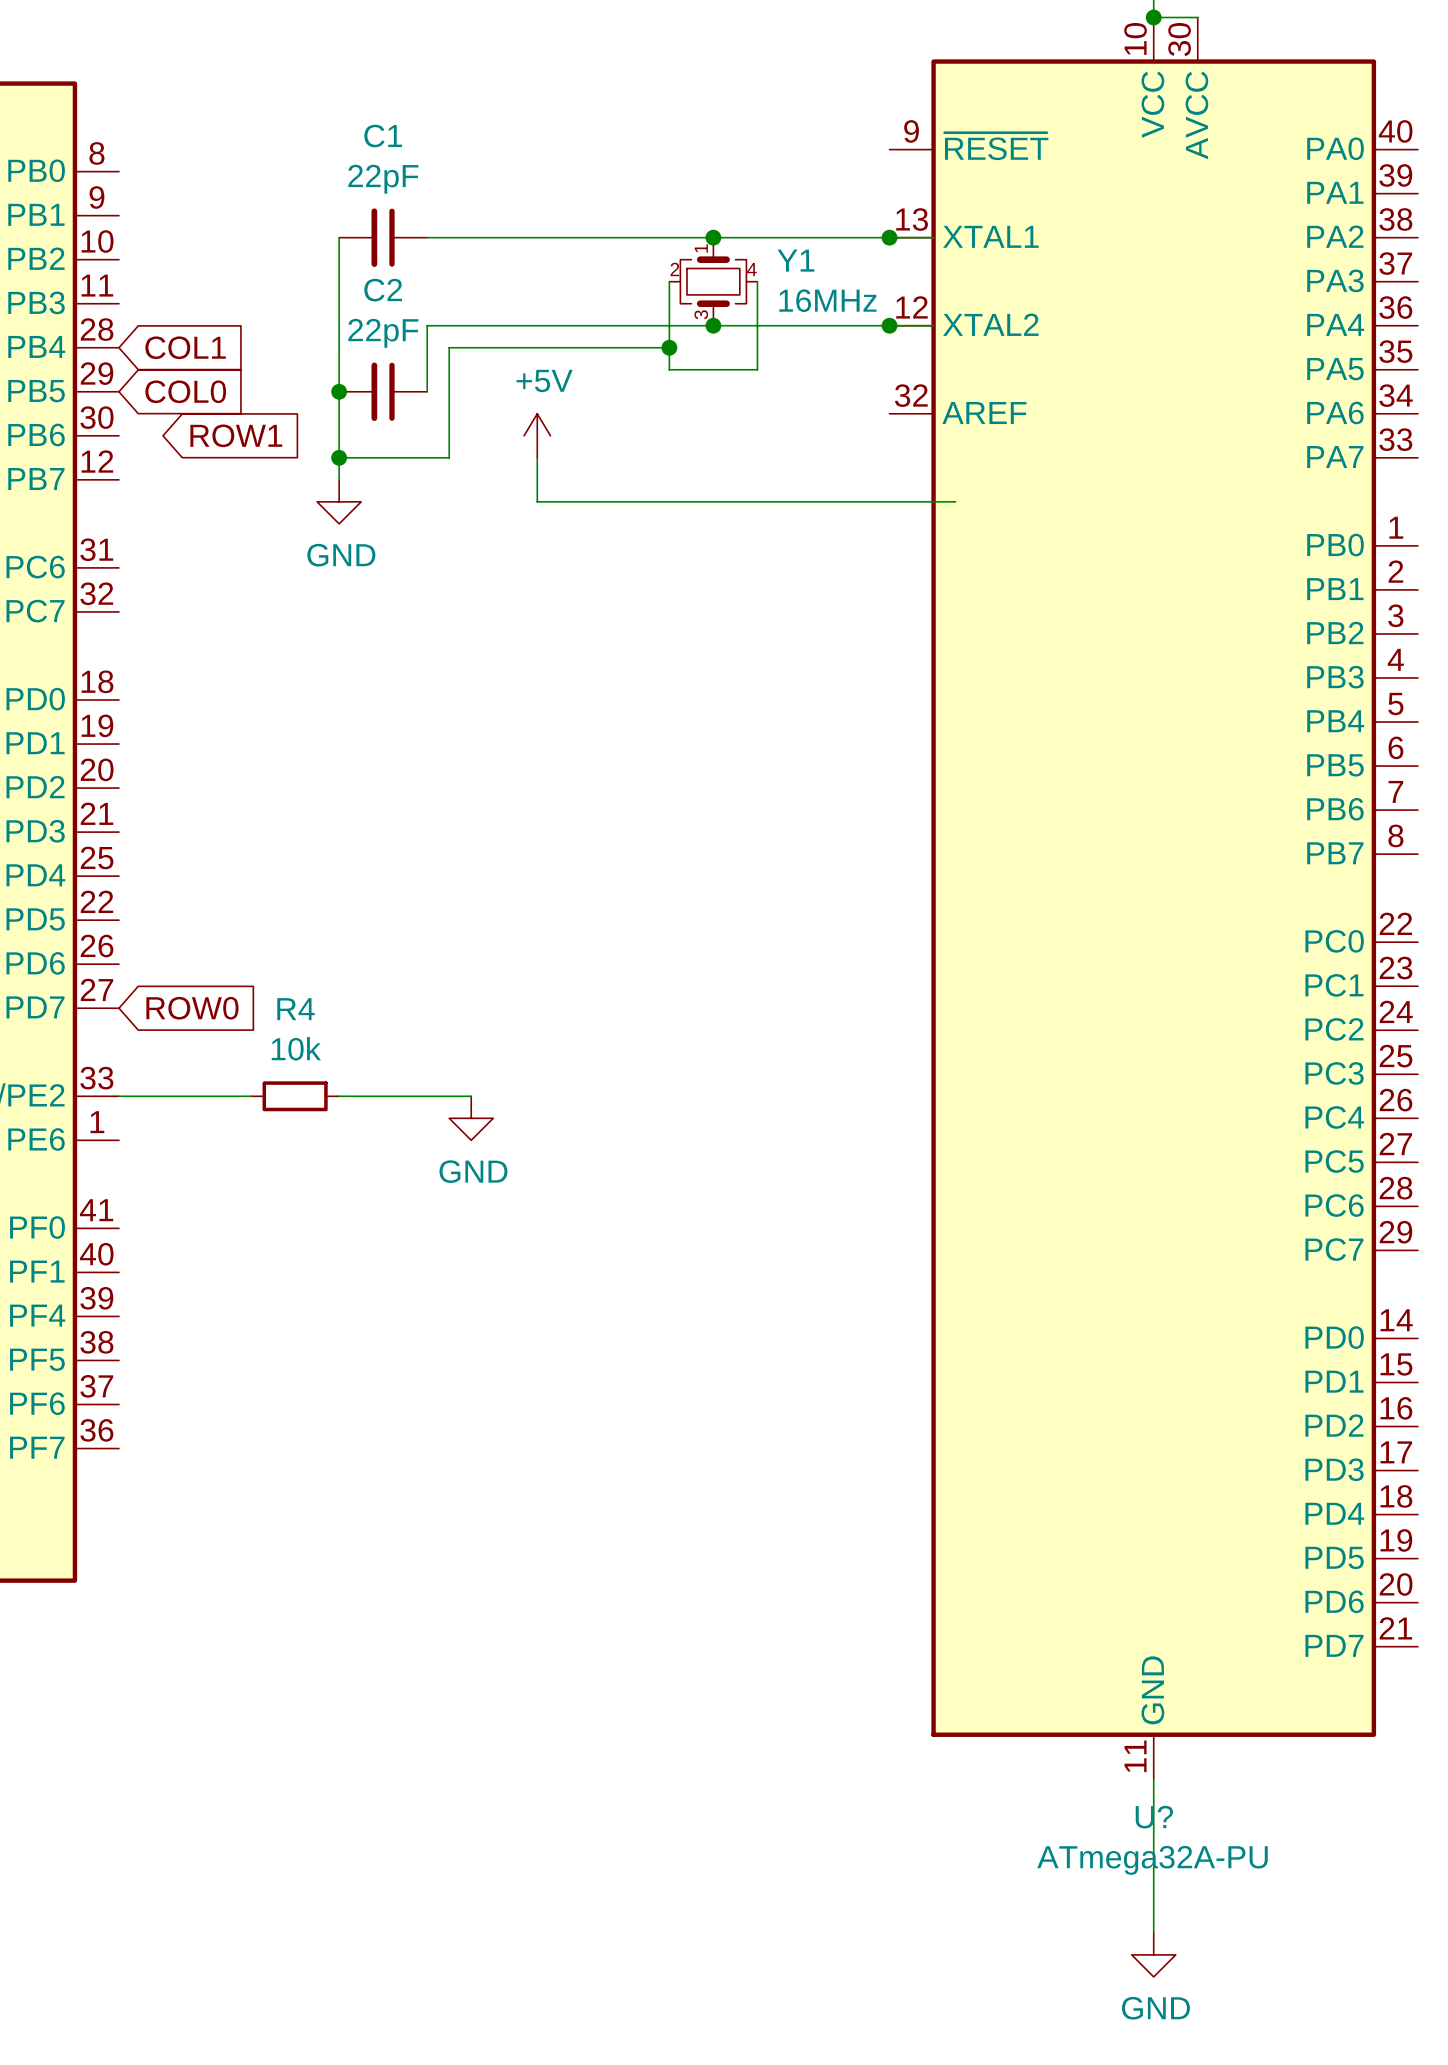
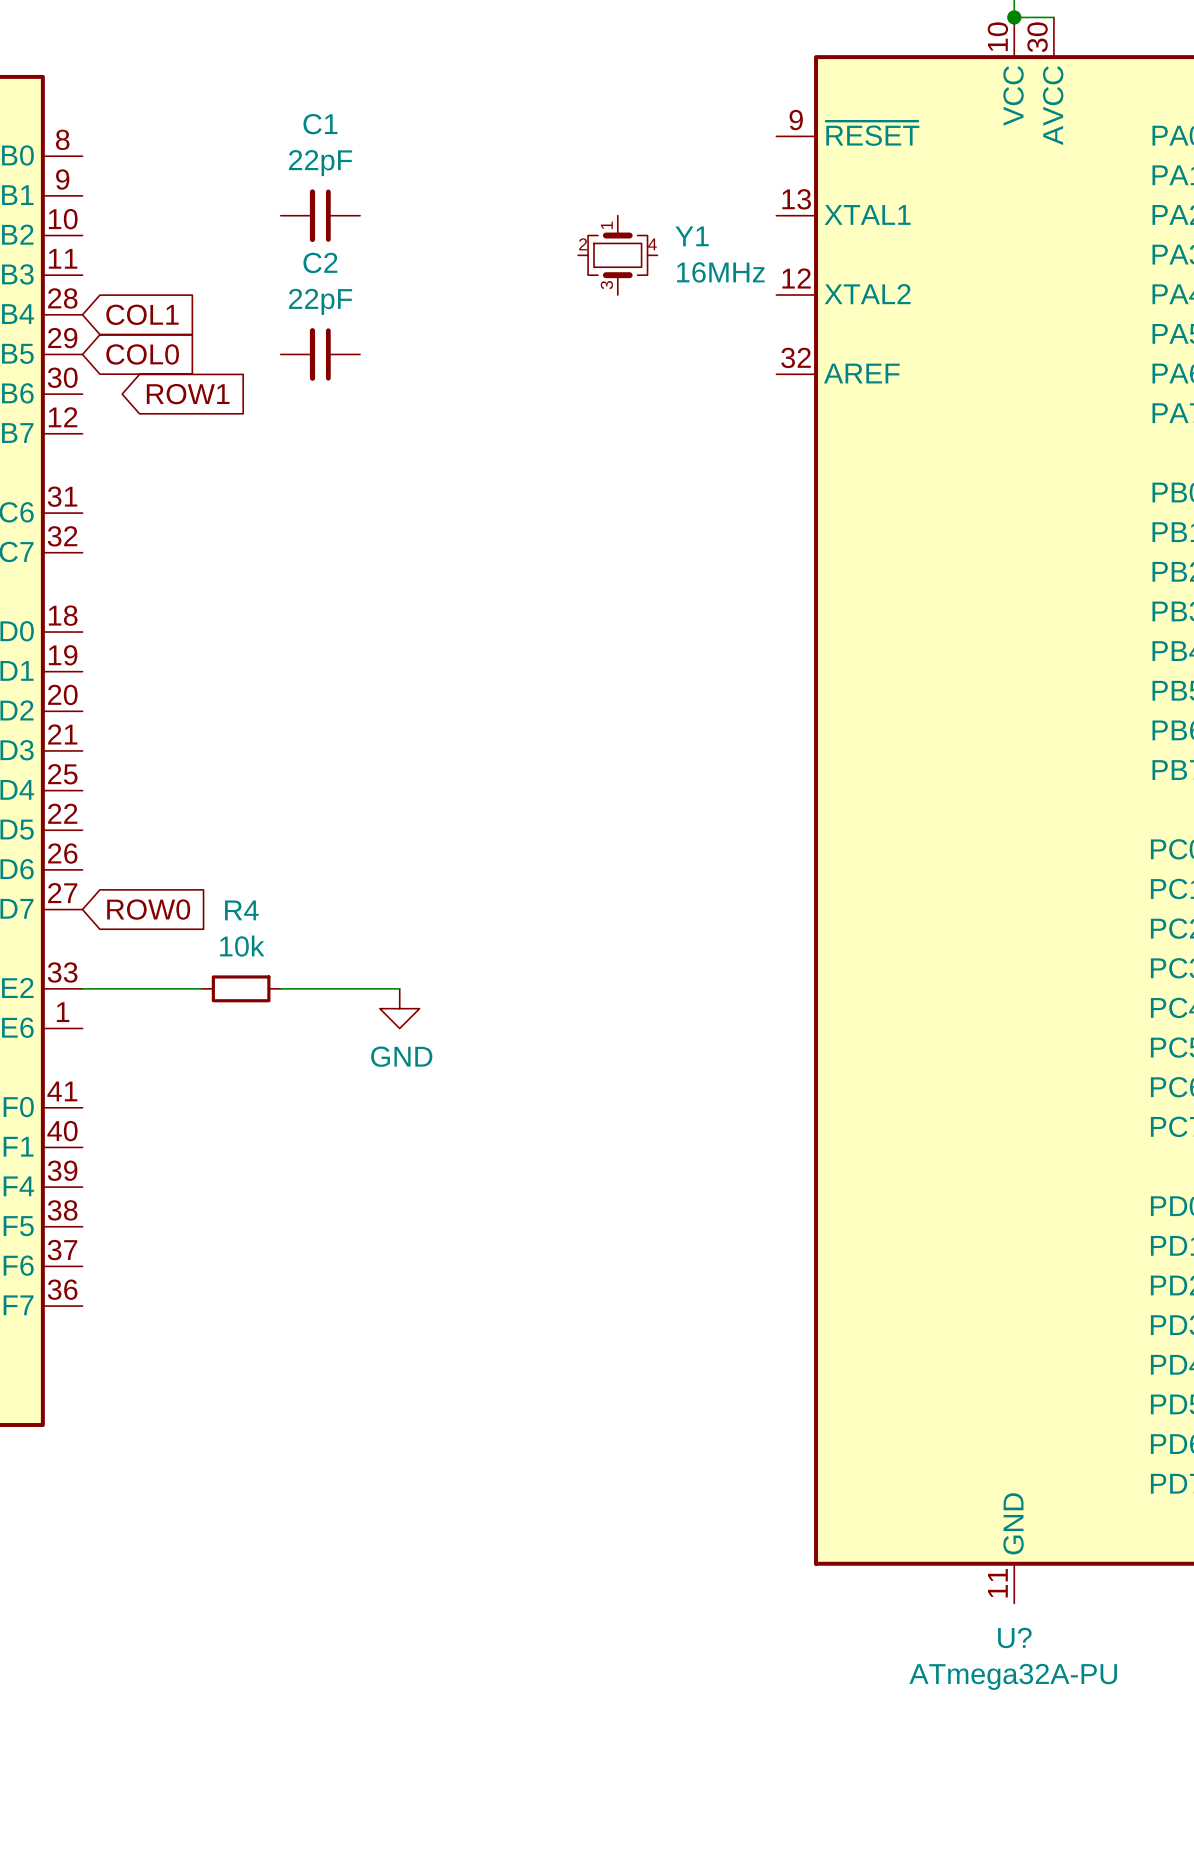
wire: (339, 237) (339, 479) -> none
wire: (427, 237) (933, 237) -> none
junction: (713, 237) -> none
junction: (889, 237) -> none
wire: (669, 281) (669, 369) (757, 369) (757, 281) -> none
junction: (713, 325) -> none
junction: (889, 325) -> none
wire: (933, 325) (427, 325) (427, 391) -> none
wire: (669, 347) (449, 347) (449, 457) (339, 457) -> none
junction: (669, 347) -> none
junction: (339, 391) -> none
power symbol: +5V (537, 435) -> none
junction: (339, 457) -> none
wire: (537, 457) (537, 501) (955, 501) -> none
power symbol: GND (339, 501) -> none
wire: (1153, 1778) (1153, 1932) -> none
power symbol: GND (1153, 1954) -> none

